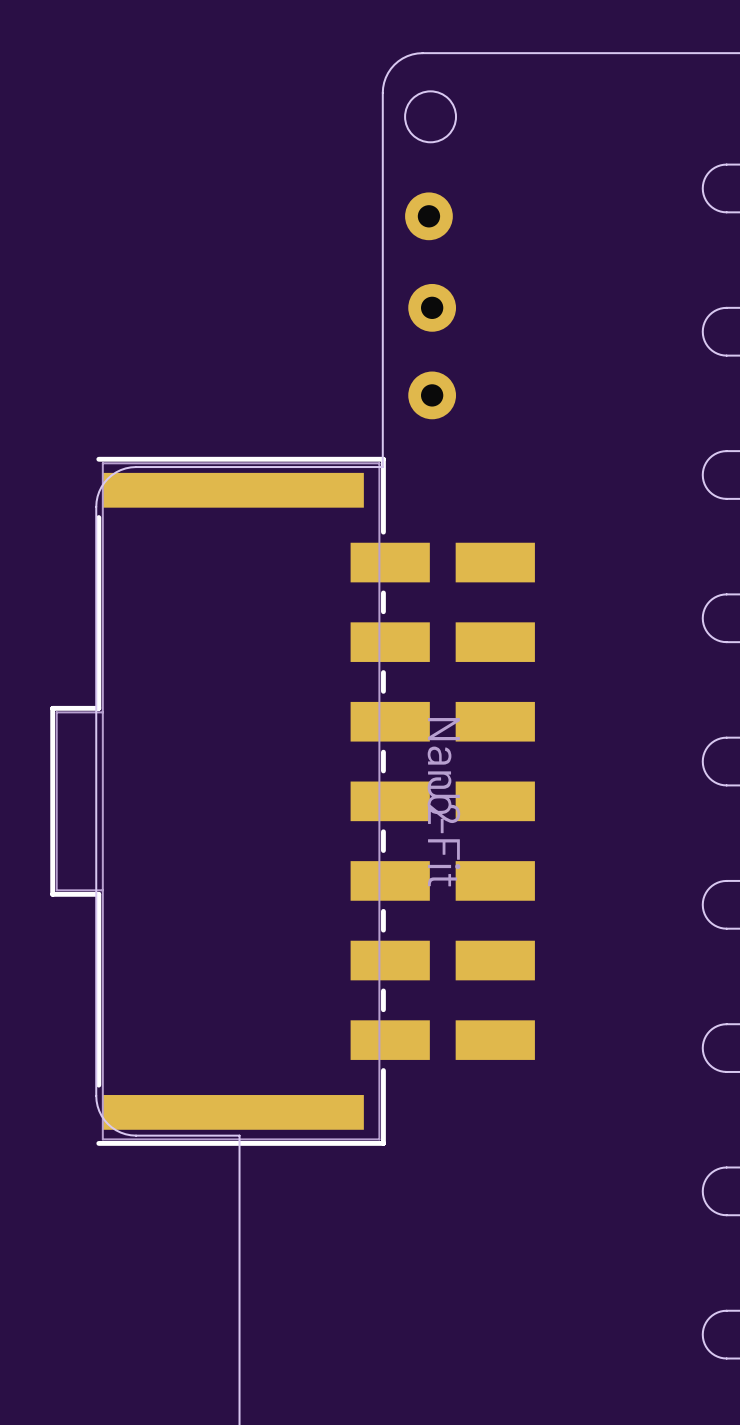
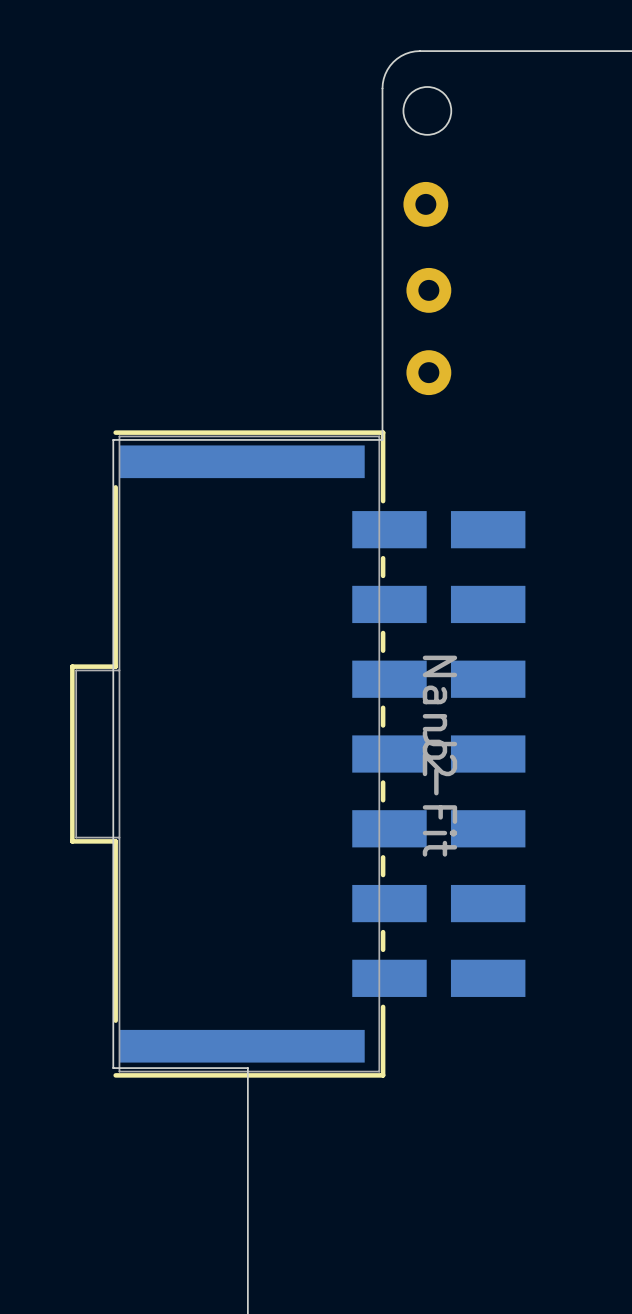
board edge: (136, 467) (120, 470) (107, 478) (99, 491) (96, 506) -> (150, 439) (113, 439) (113, 477)
board edge: (96, 1095) (99, 1111) (107, 1123) (120, 1132) (136, 1135) -> (113, 1030) (113, 1068) (150, 1068)

